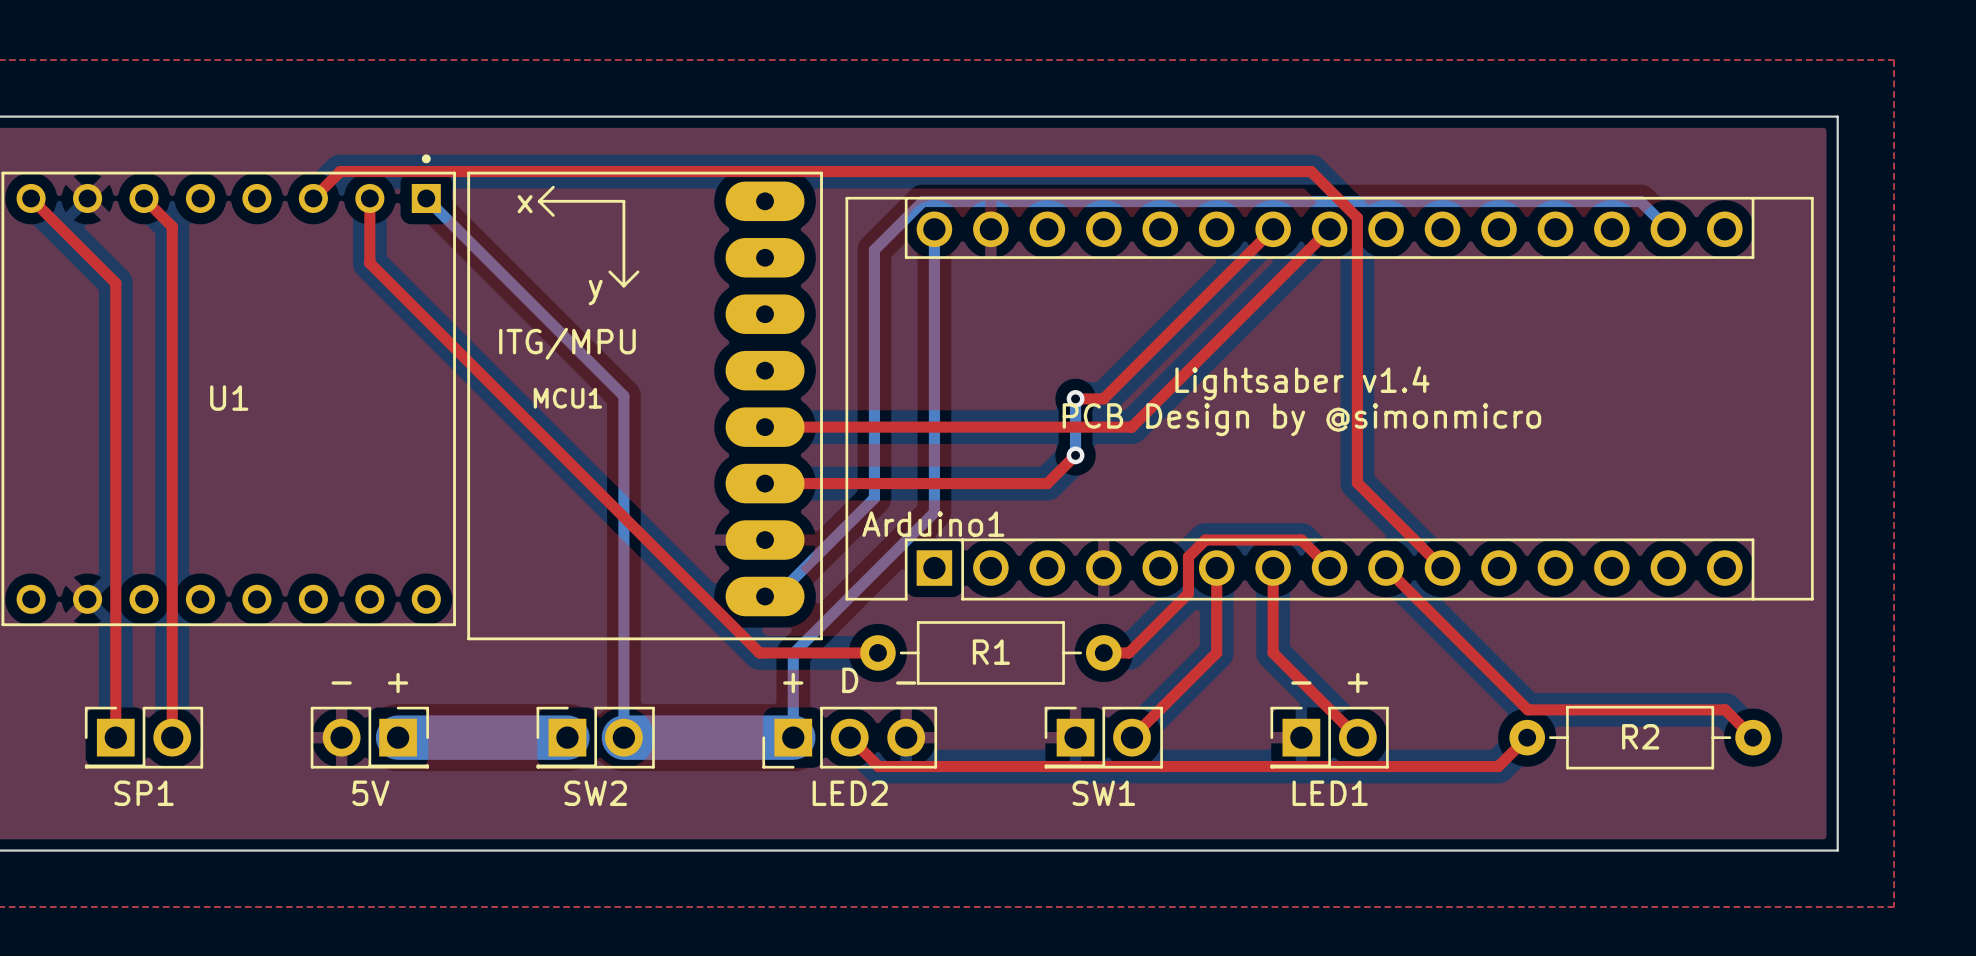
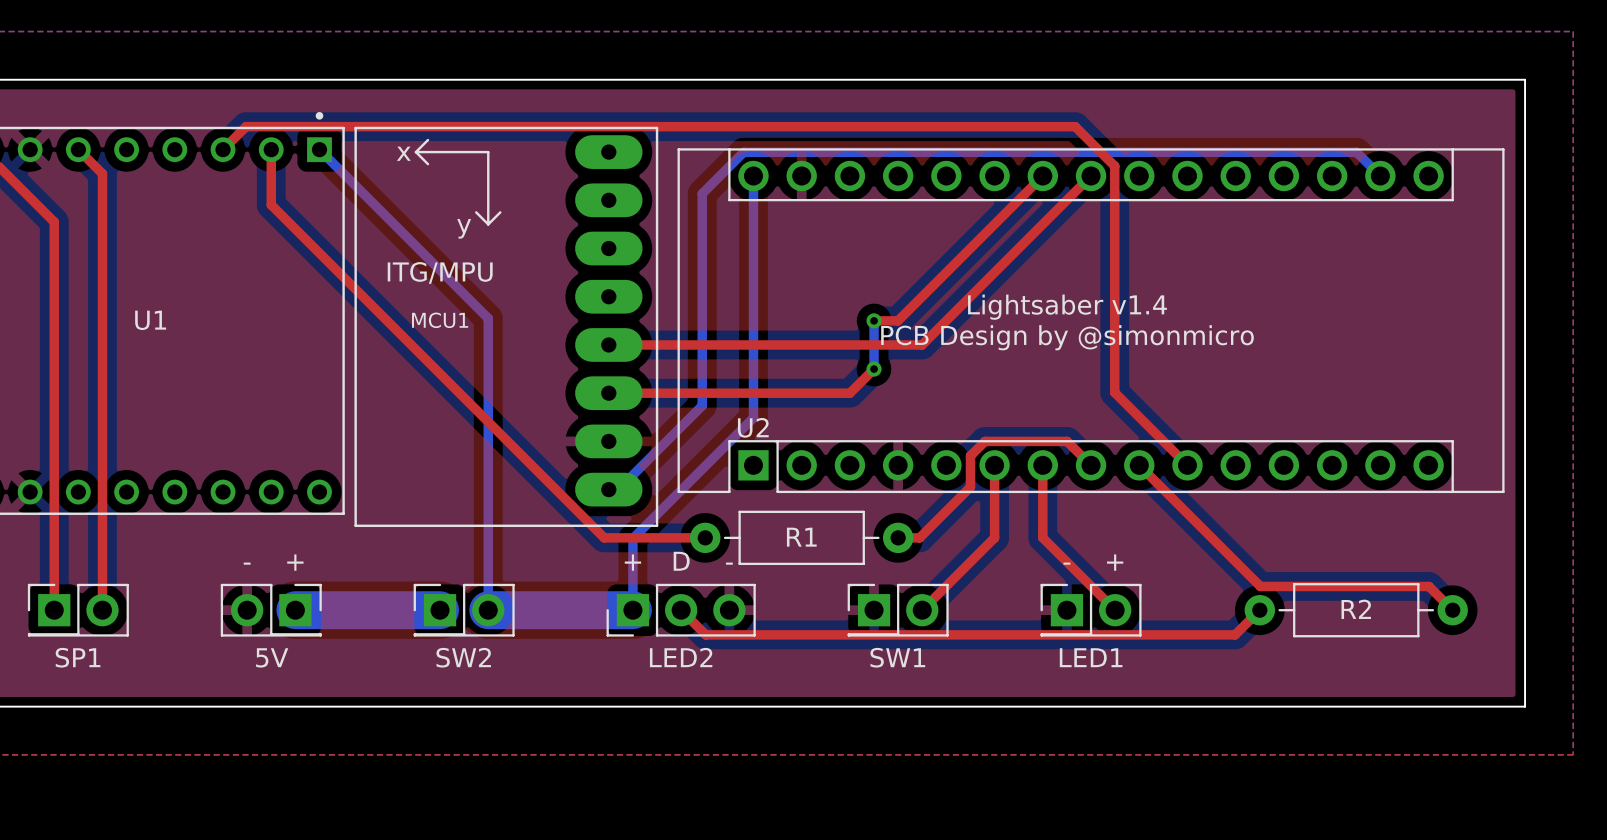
Arduino1 name: Arduino1 (933, 524) -> U2 (753, 427)

